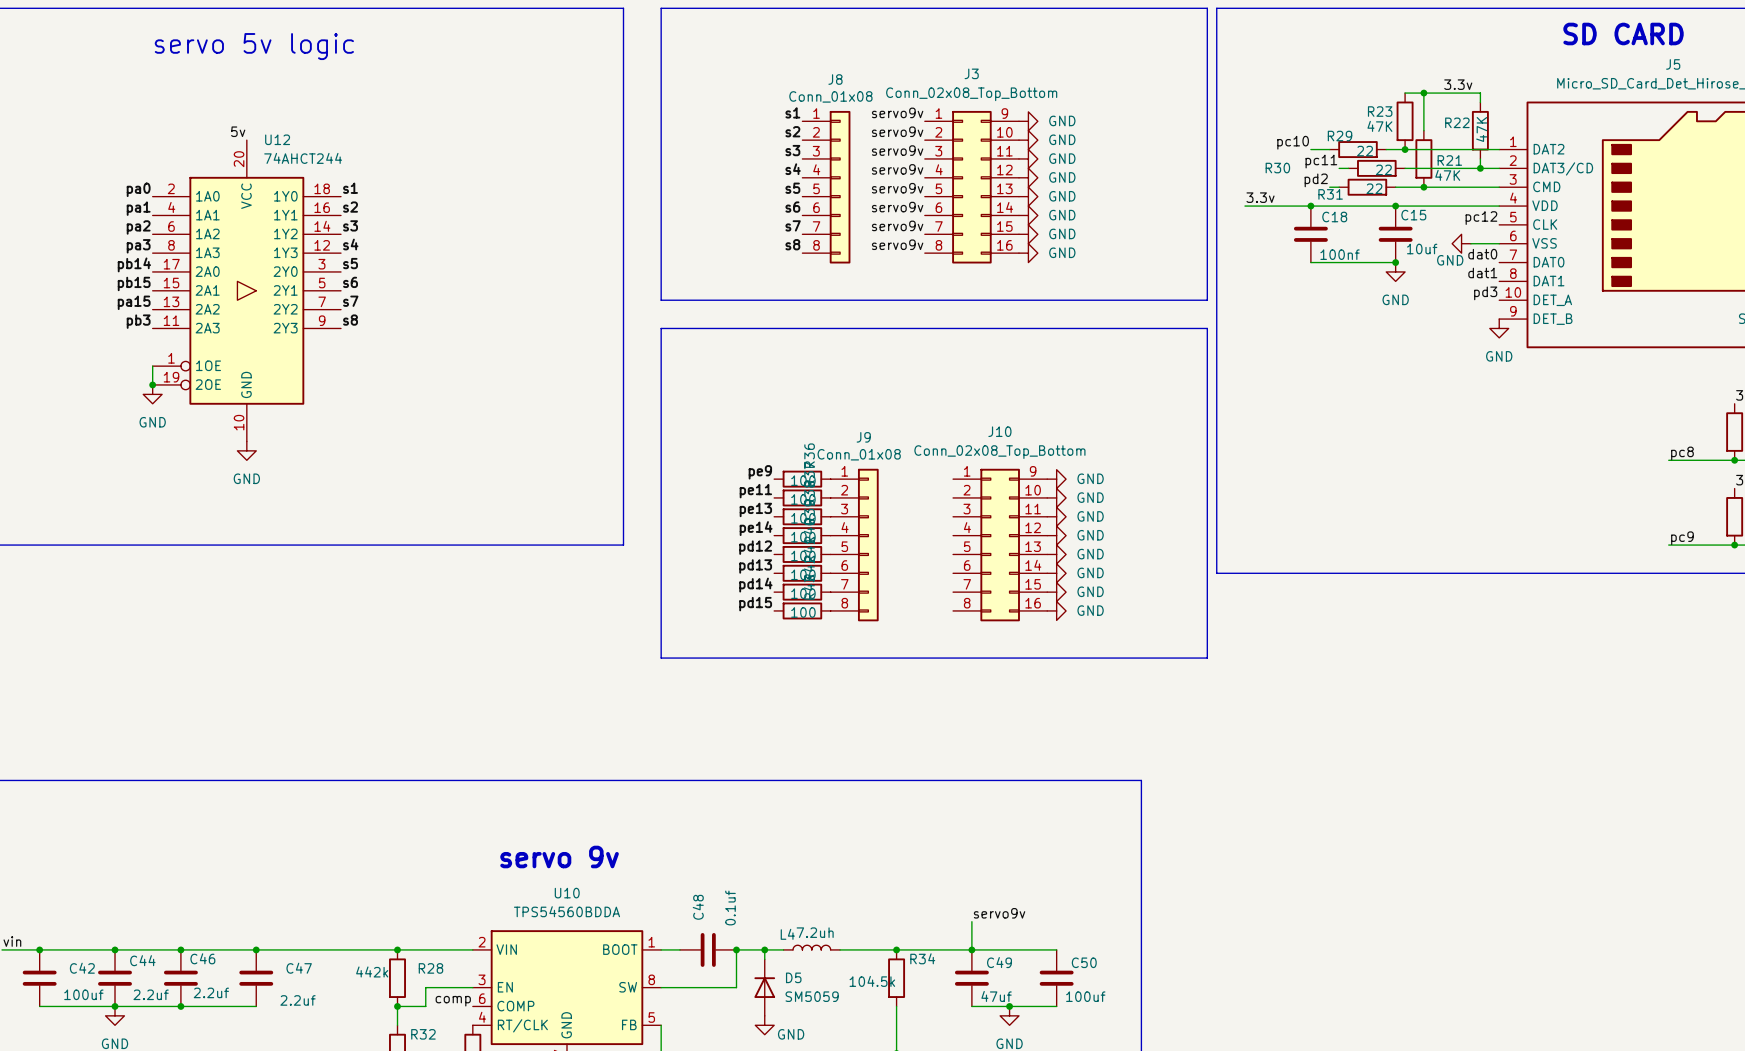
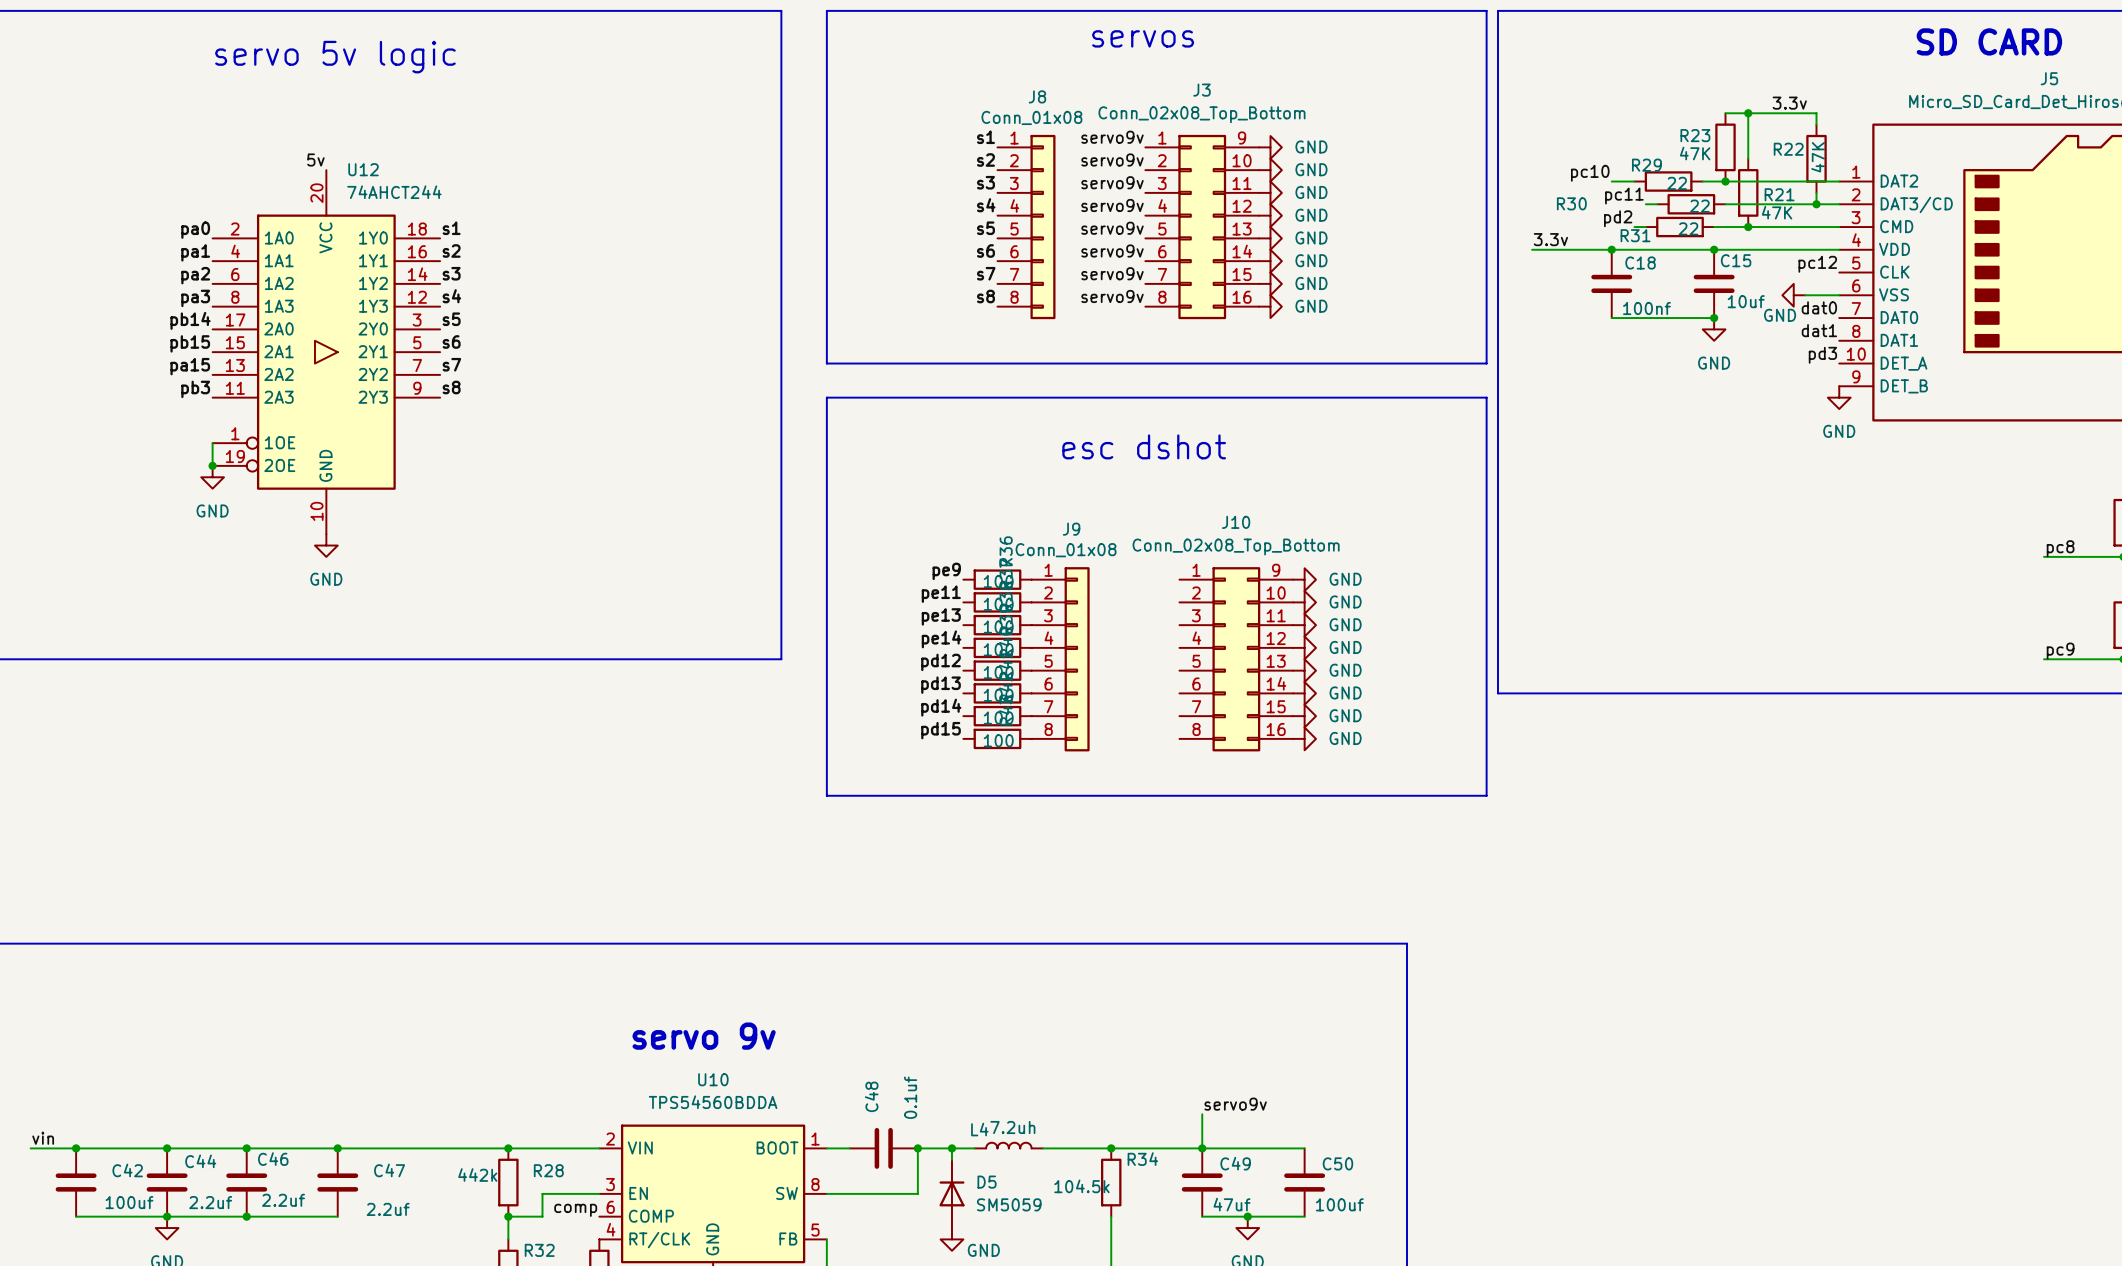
text: none -> servos (1143, 38)
text: none -> esc dshot (1144, 446)

